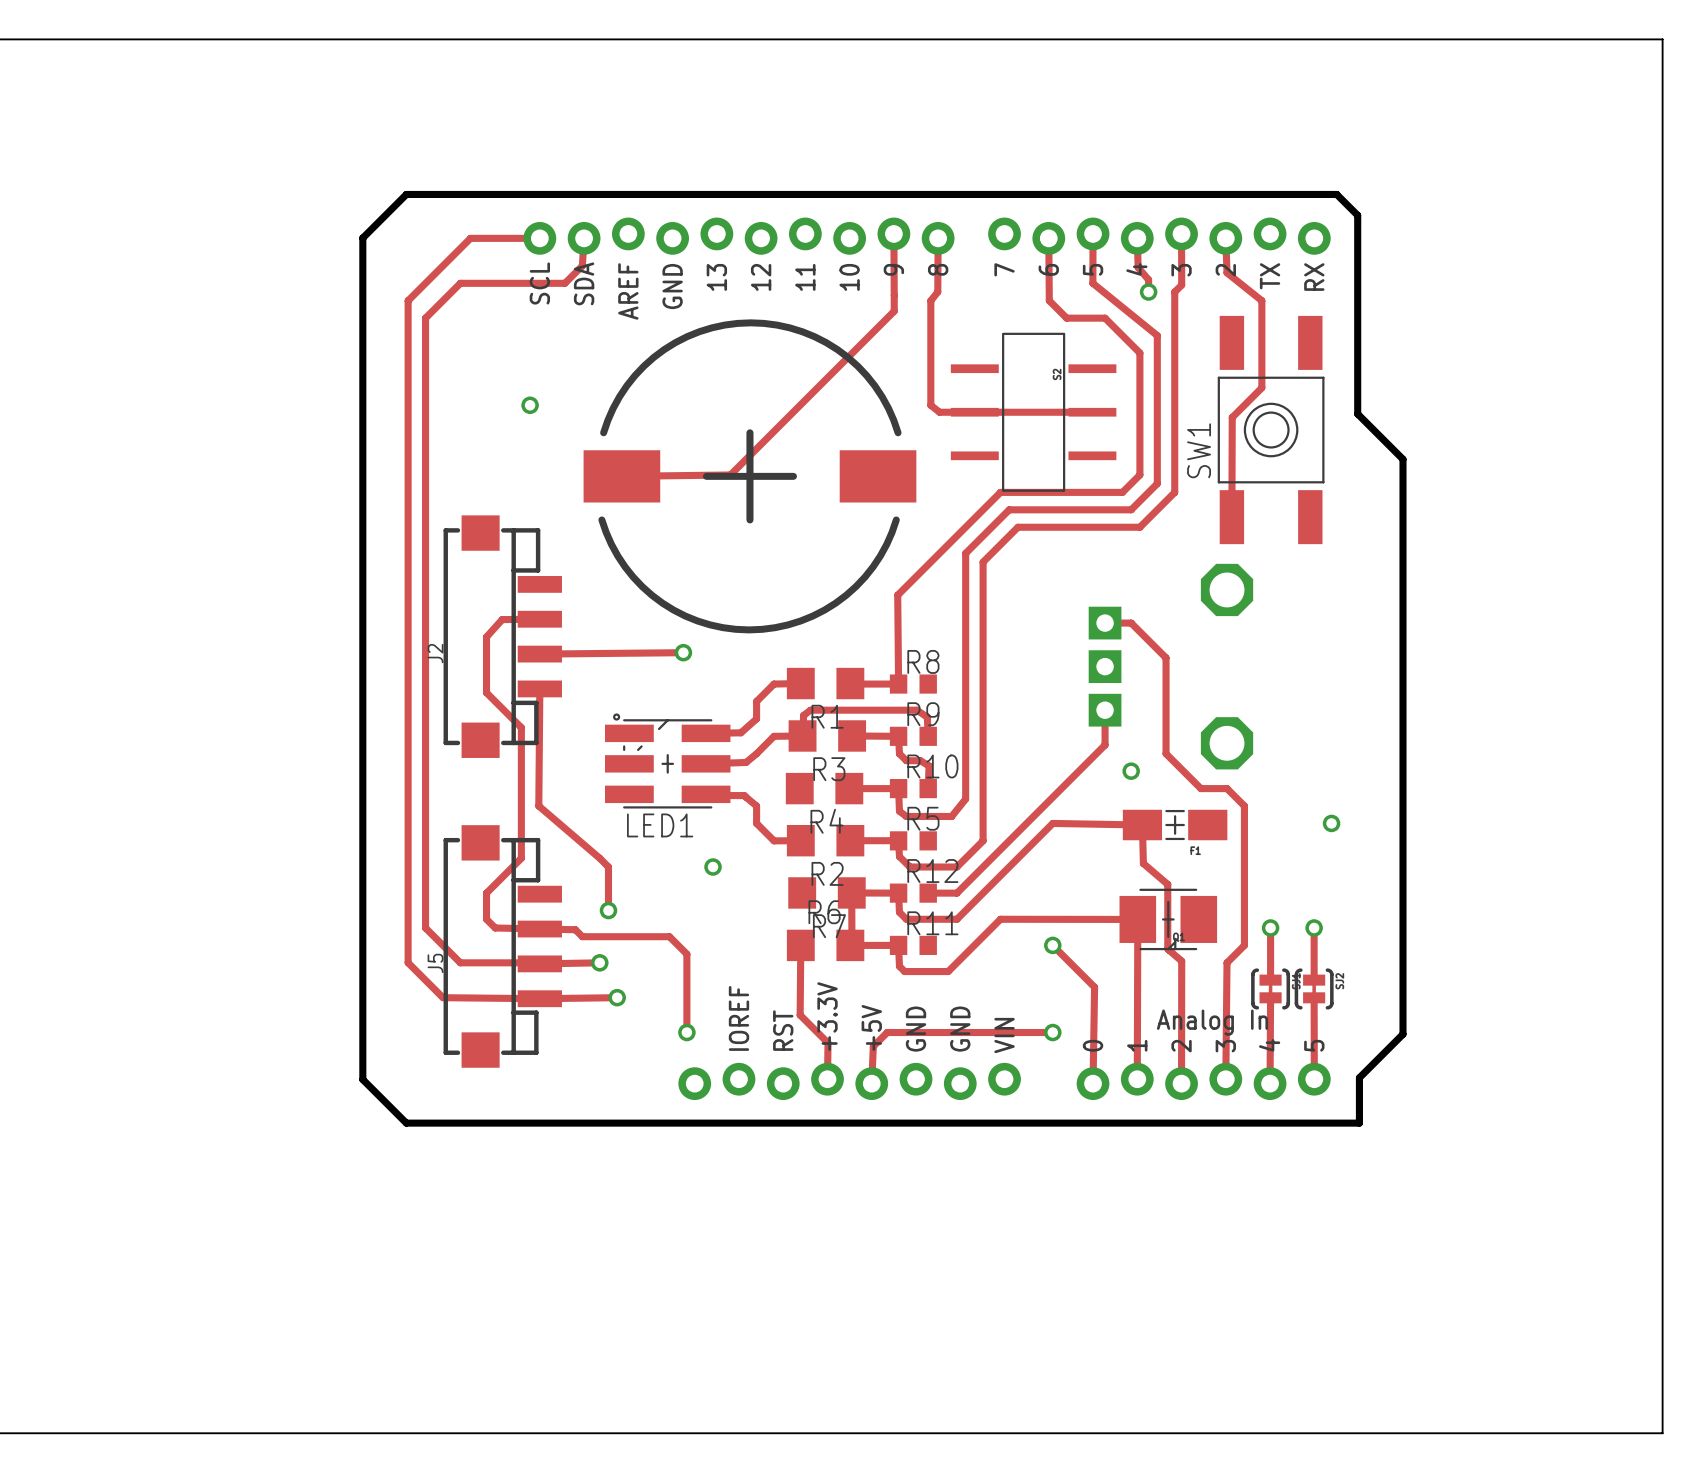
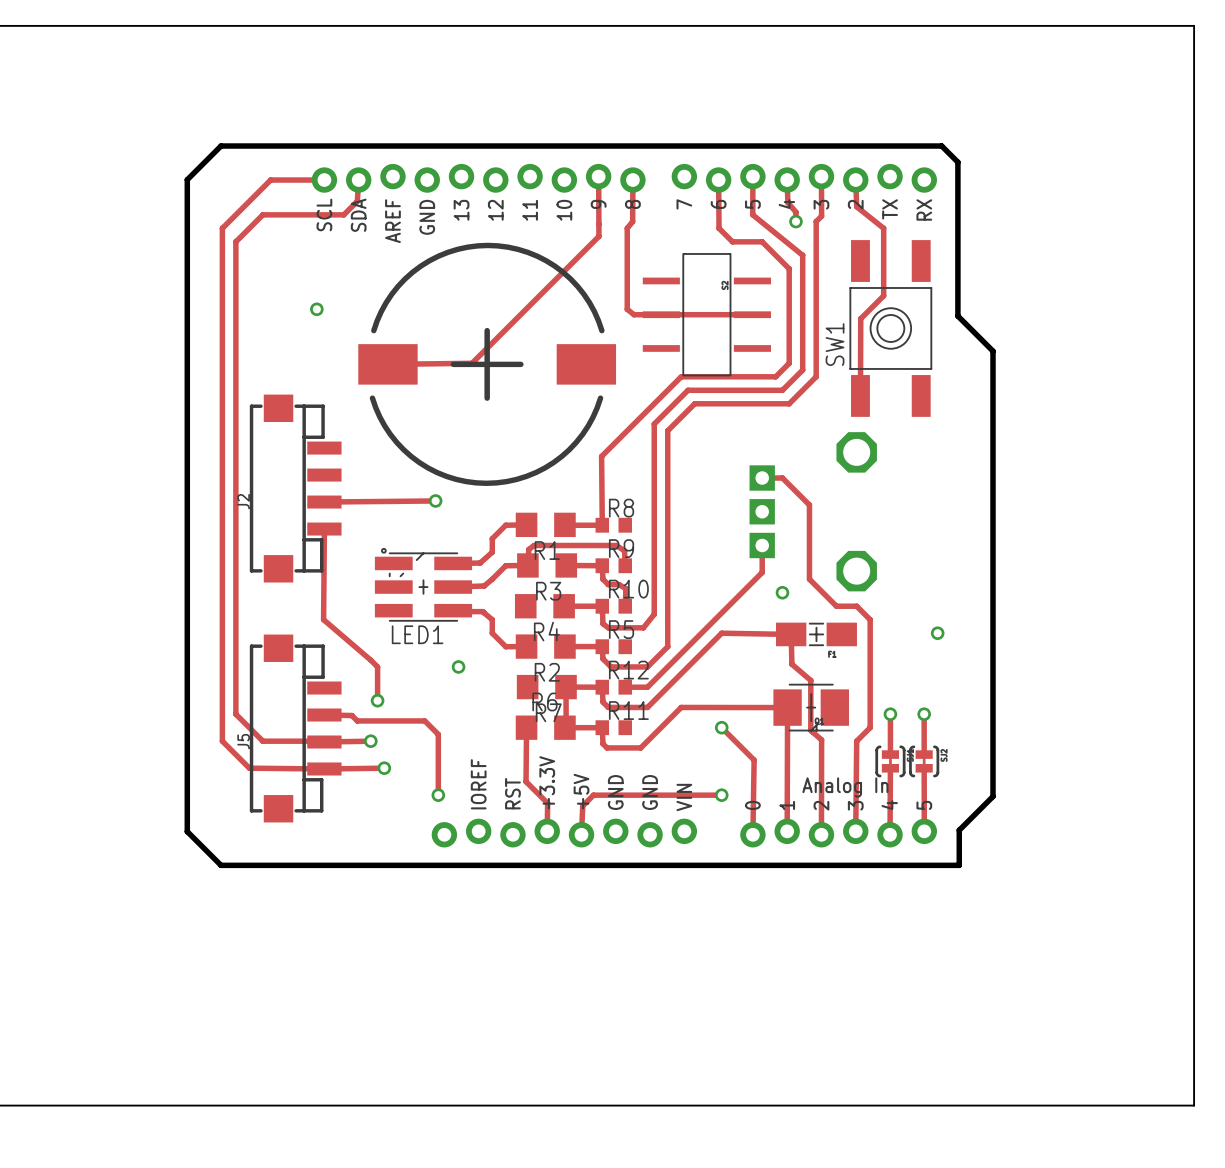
track: (539, 619) (502, 619) (486, 637) (486, 692) (521, 727) (521, 858) (486, 893) (486, 919) (495, 927) (539, 929) -> none

